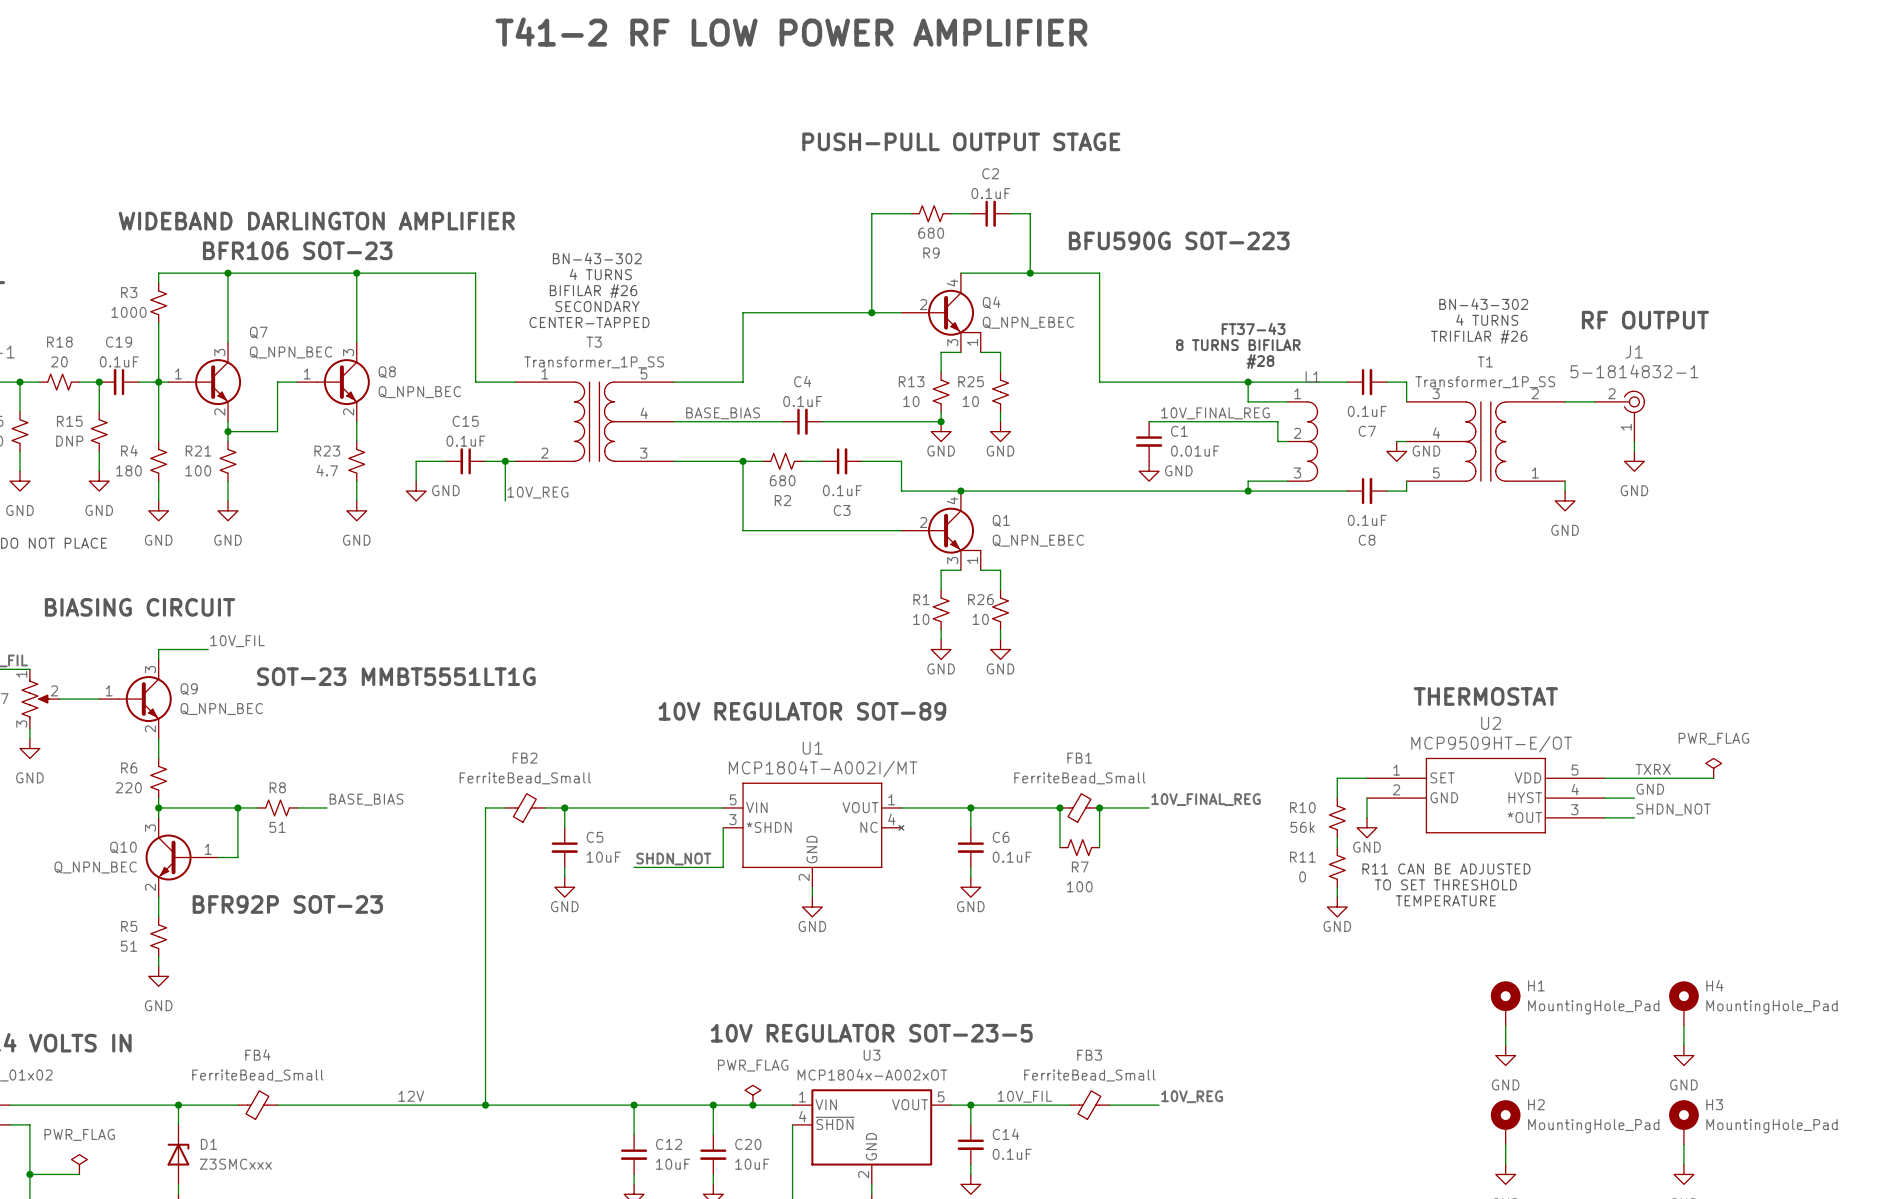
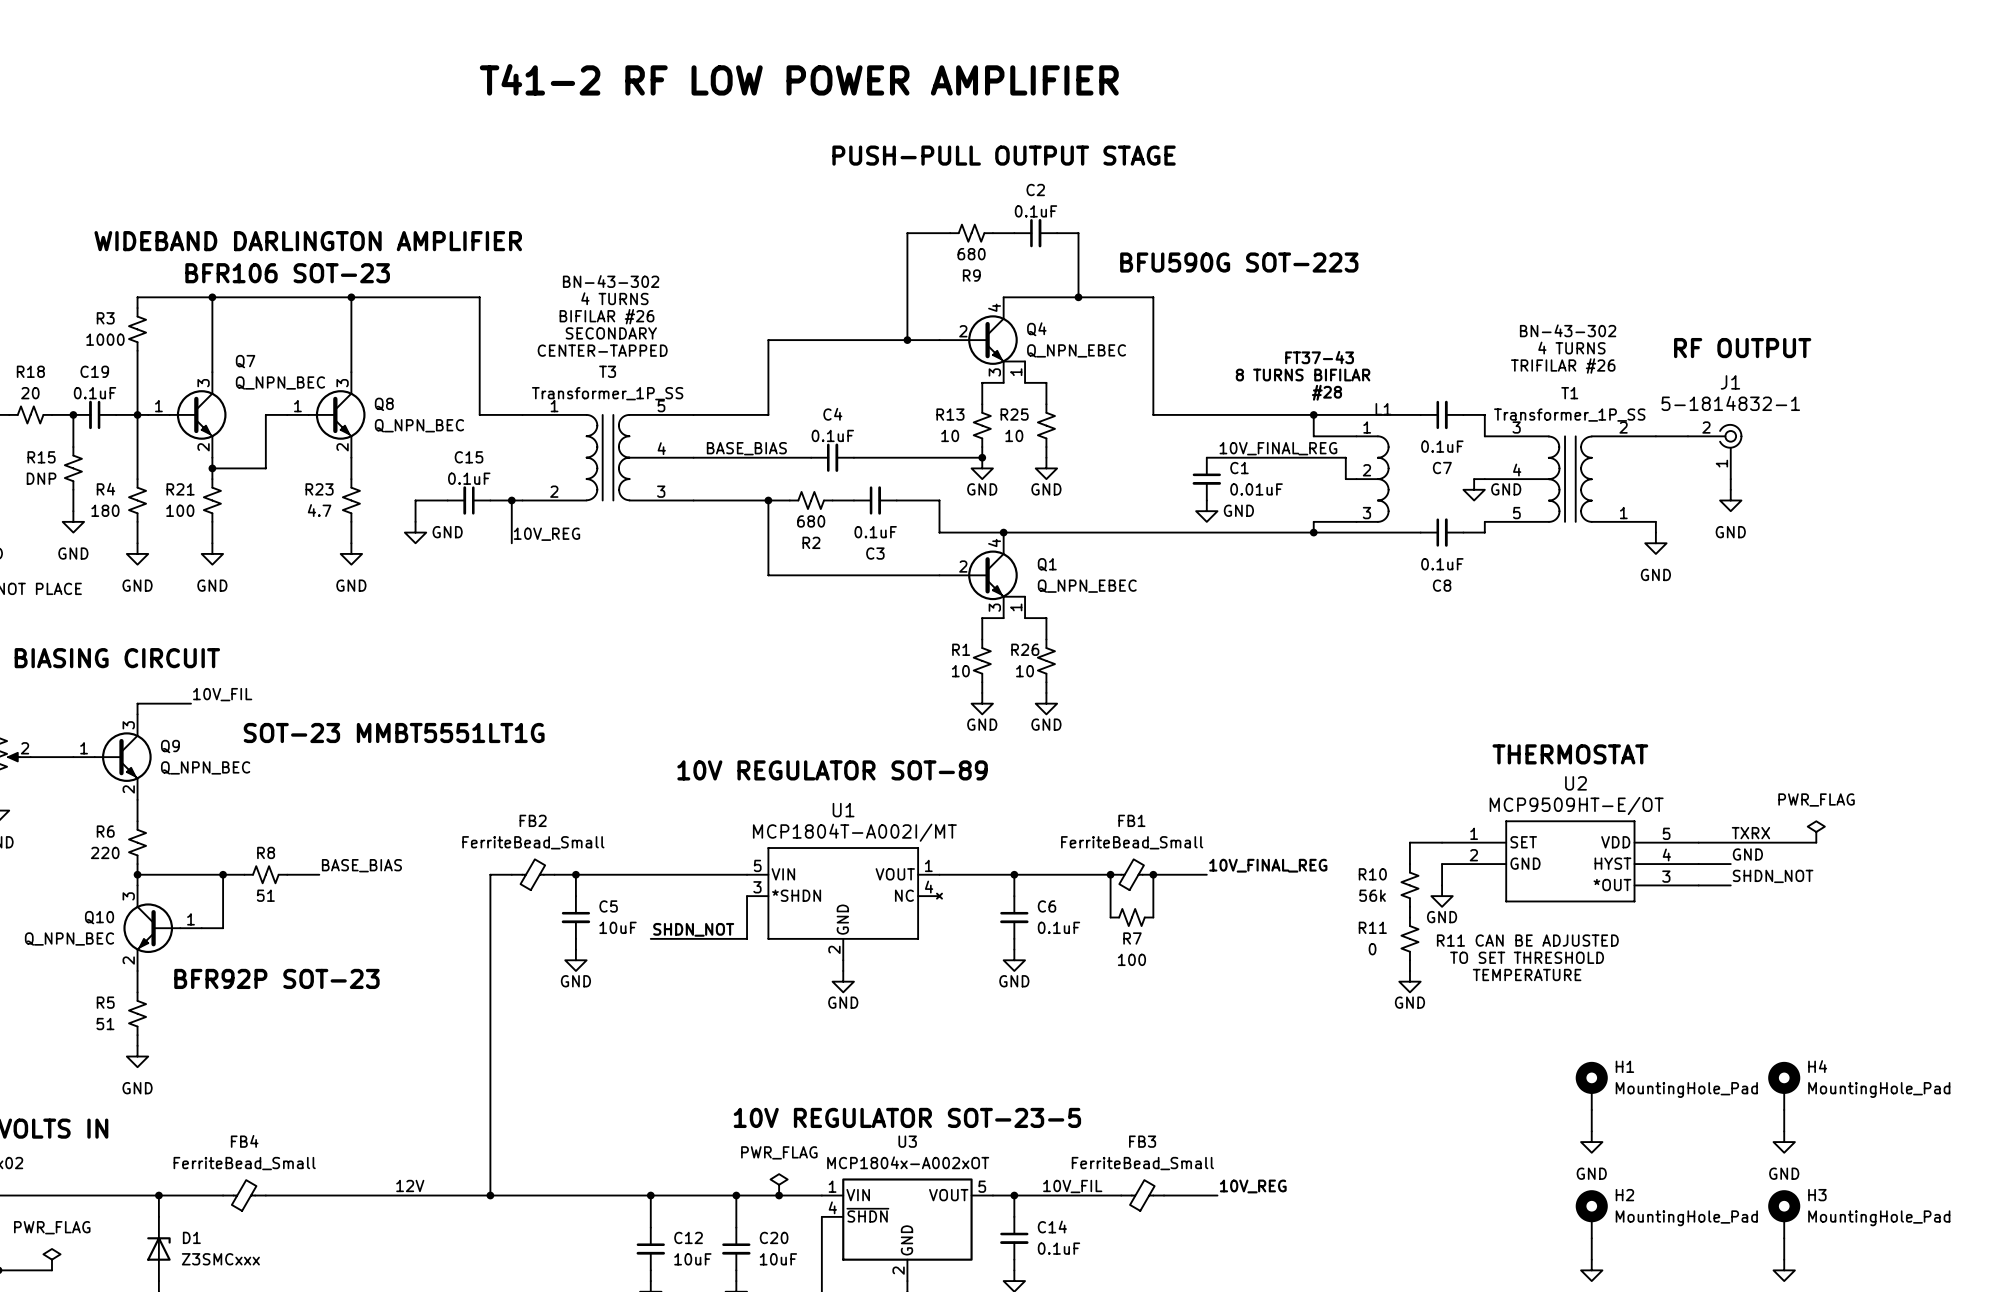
text position: T41-2 RF LOW POWER AMPLIFIER (791, 32) -> T41-2 RF LOW POWER AMPLIFIER (799, 79)

